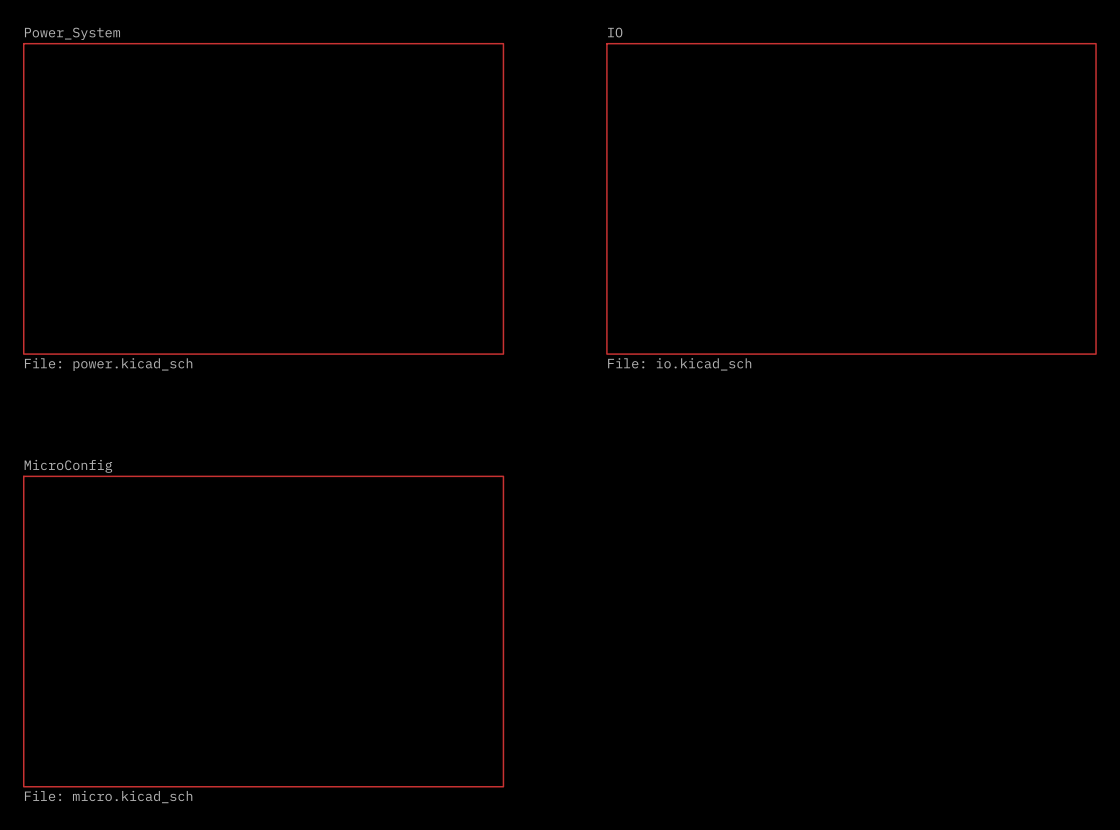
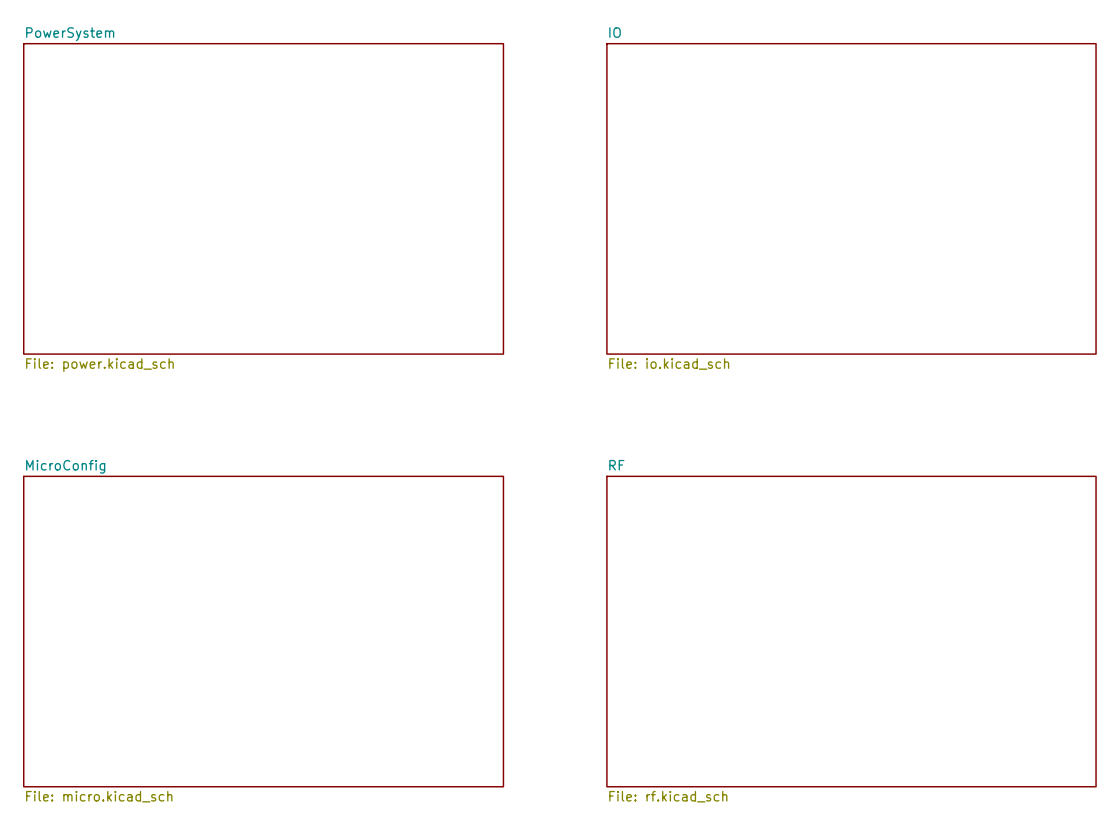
sheet Power_System name: Power_System (72, 33) -> PowerSystem (70, 34)
sheet RF: none -> File: rf.kicad_sch (851, 631)

